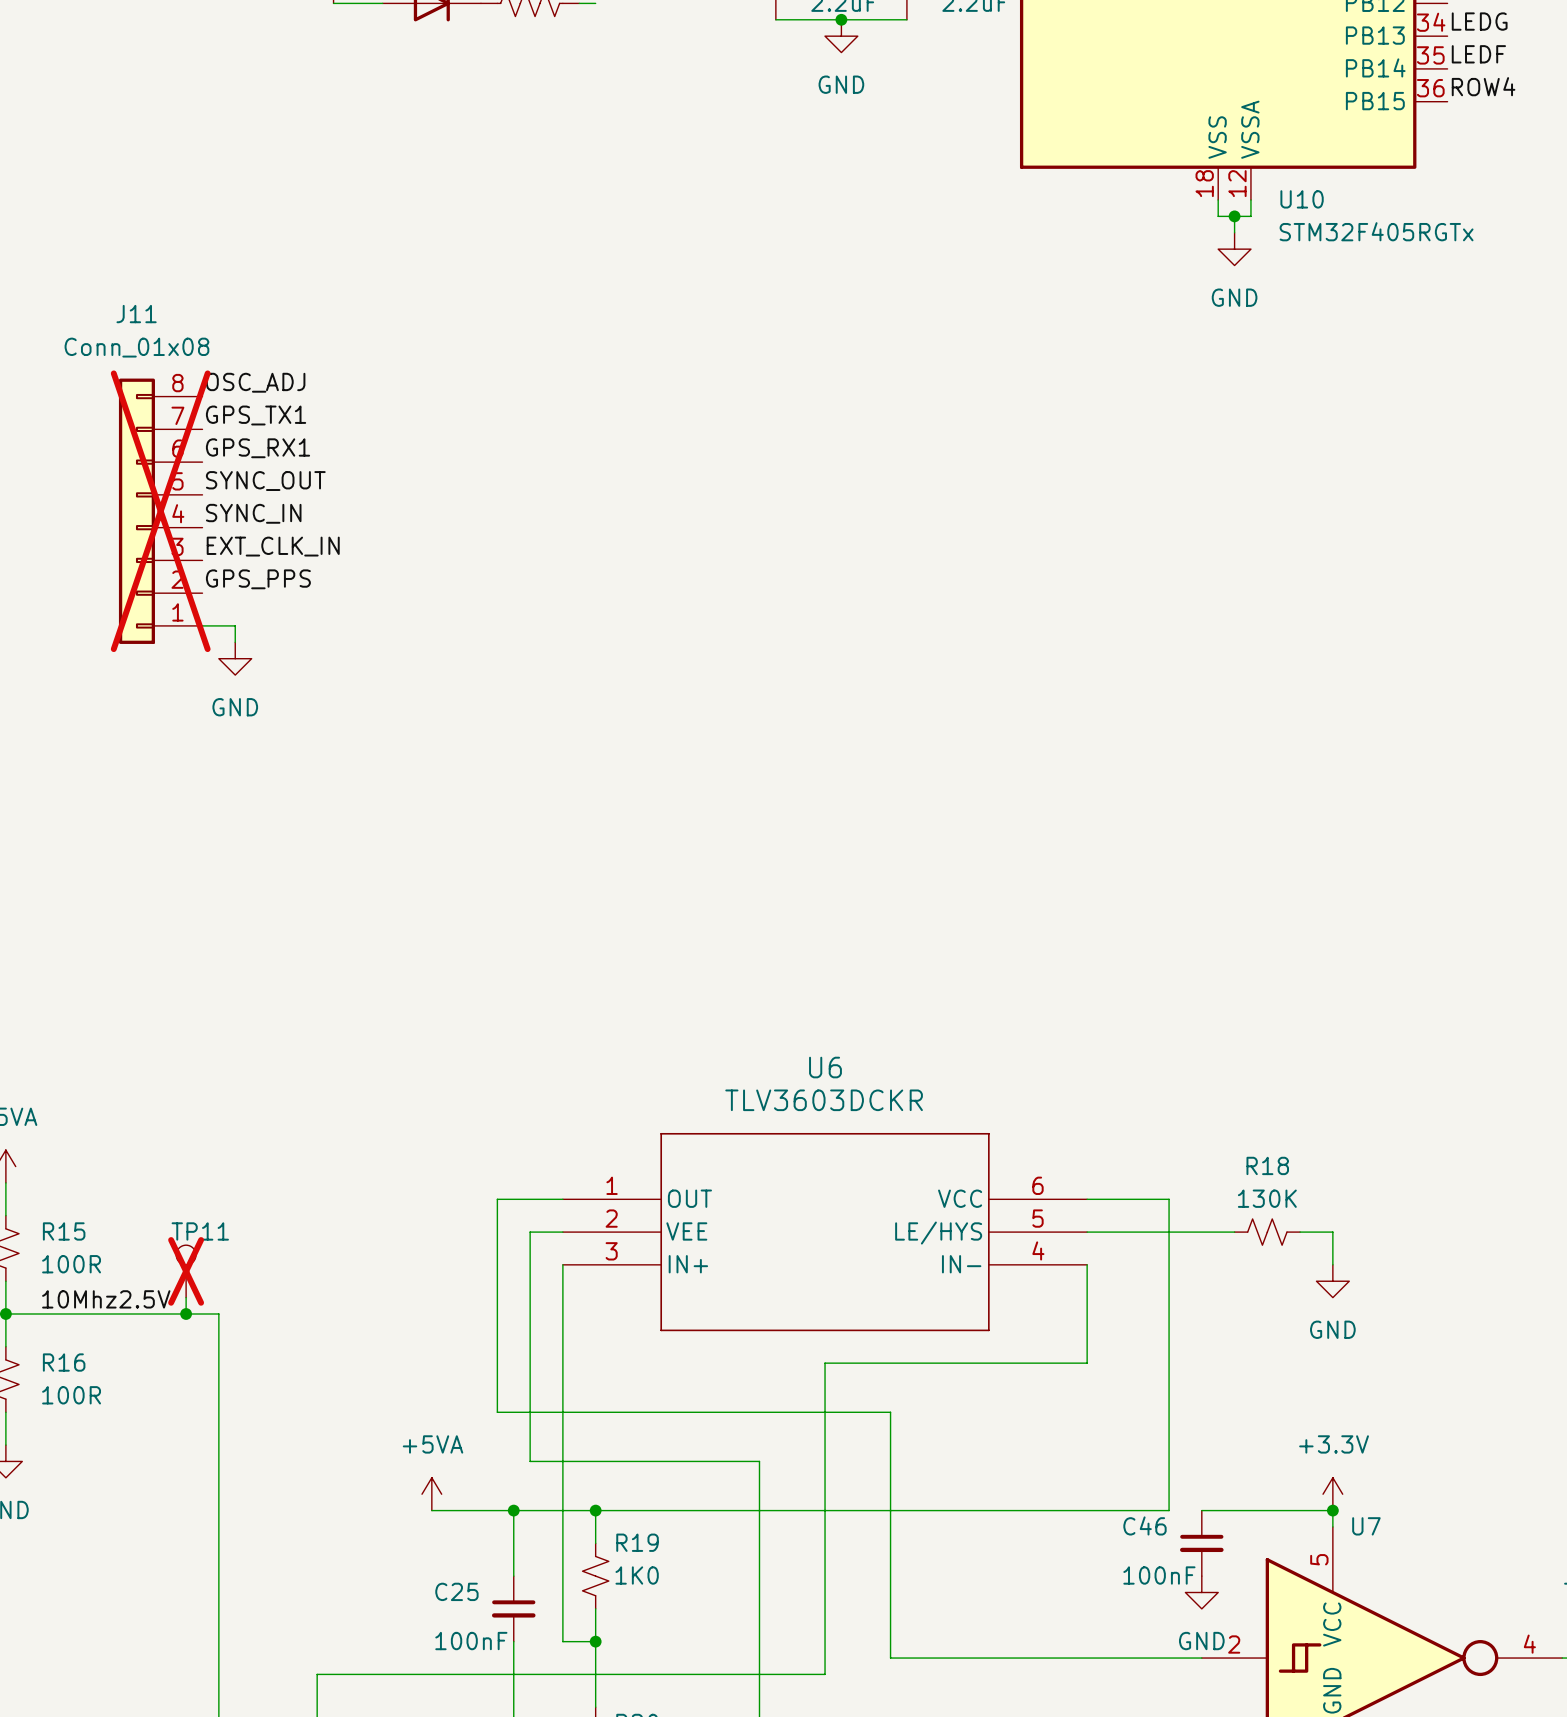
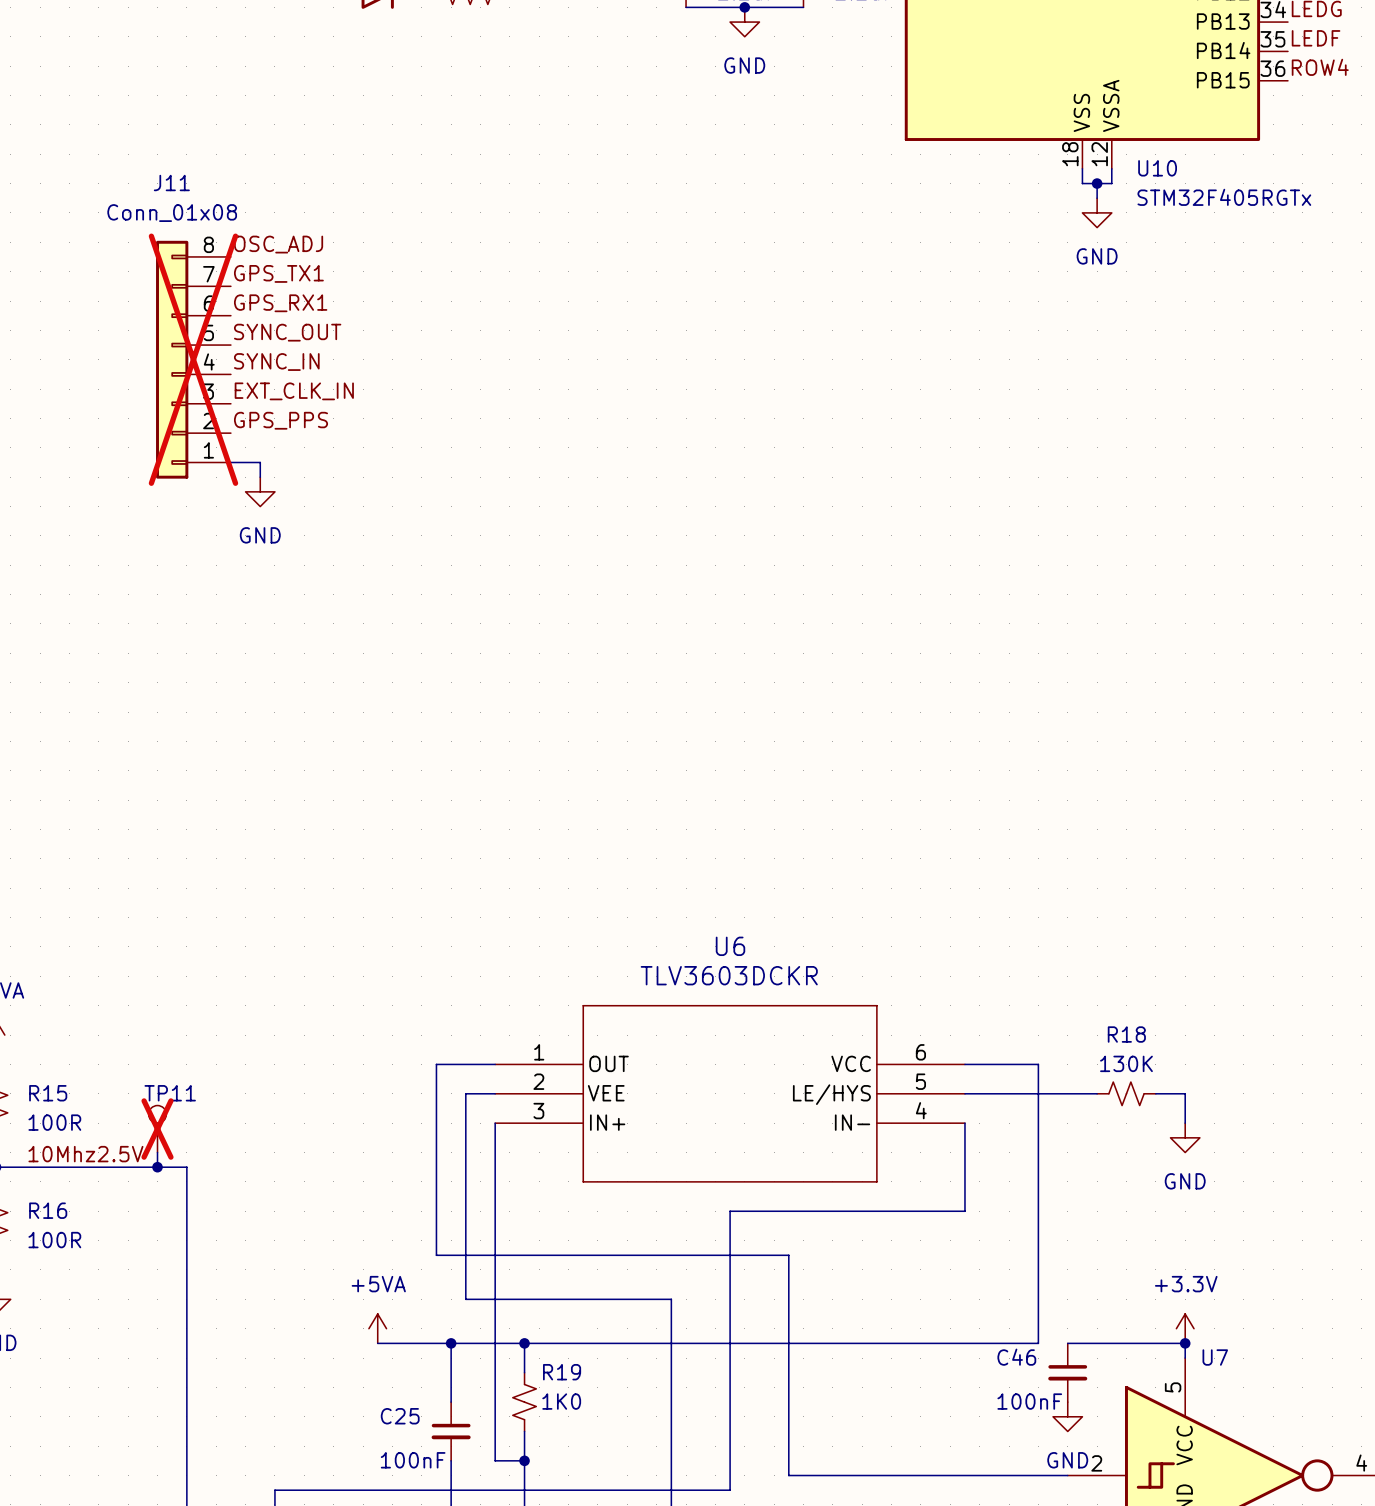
label position: OSC_ADJ (255, 382) -> OSC_ADJ (278, 244)
label position: GPS_TX1 (256, 415) -> GPS_TX1 (278, 273)
label position: GPS_RX1 (258, 448) -> GPS_RX1 (280, 303)
label position: SYNC_OUT (265, 481) -> SYNC_OUT (287, 332)
J11 position: (160, 511) -> (193, 359)
label position: SYNC_IN (253, 513) -> SYNC_IN (276, 362)
label position: EXT_CLK_IN (273, 546) -> EXT_CLK_IN (294, 391)
label position: GPS_PPS (258, 579) -> GPS_PPS (281, 420)
wire: (202, 625) (235, 625) (235, 642) -> (230, 462) (260, 462) (260, 477)
power symbol position: GND (235, 658) -> GND (260, 491)

